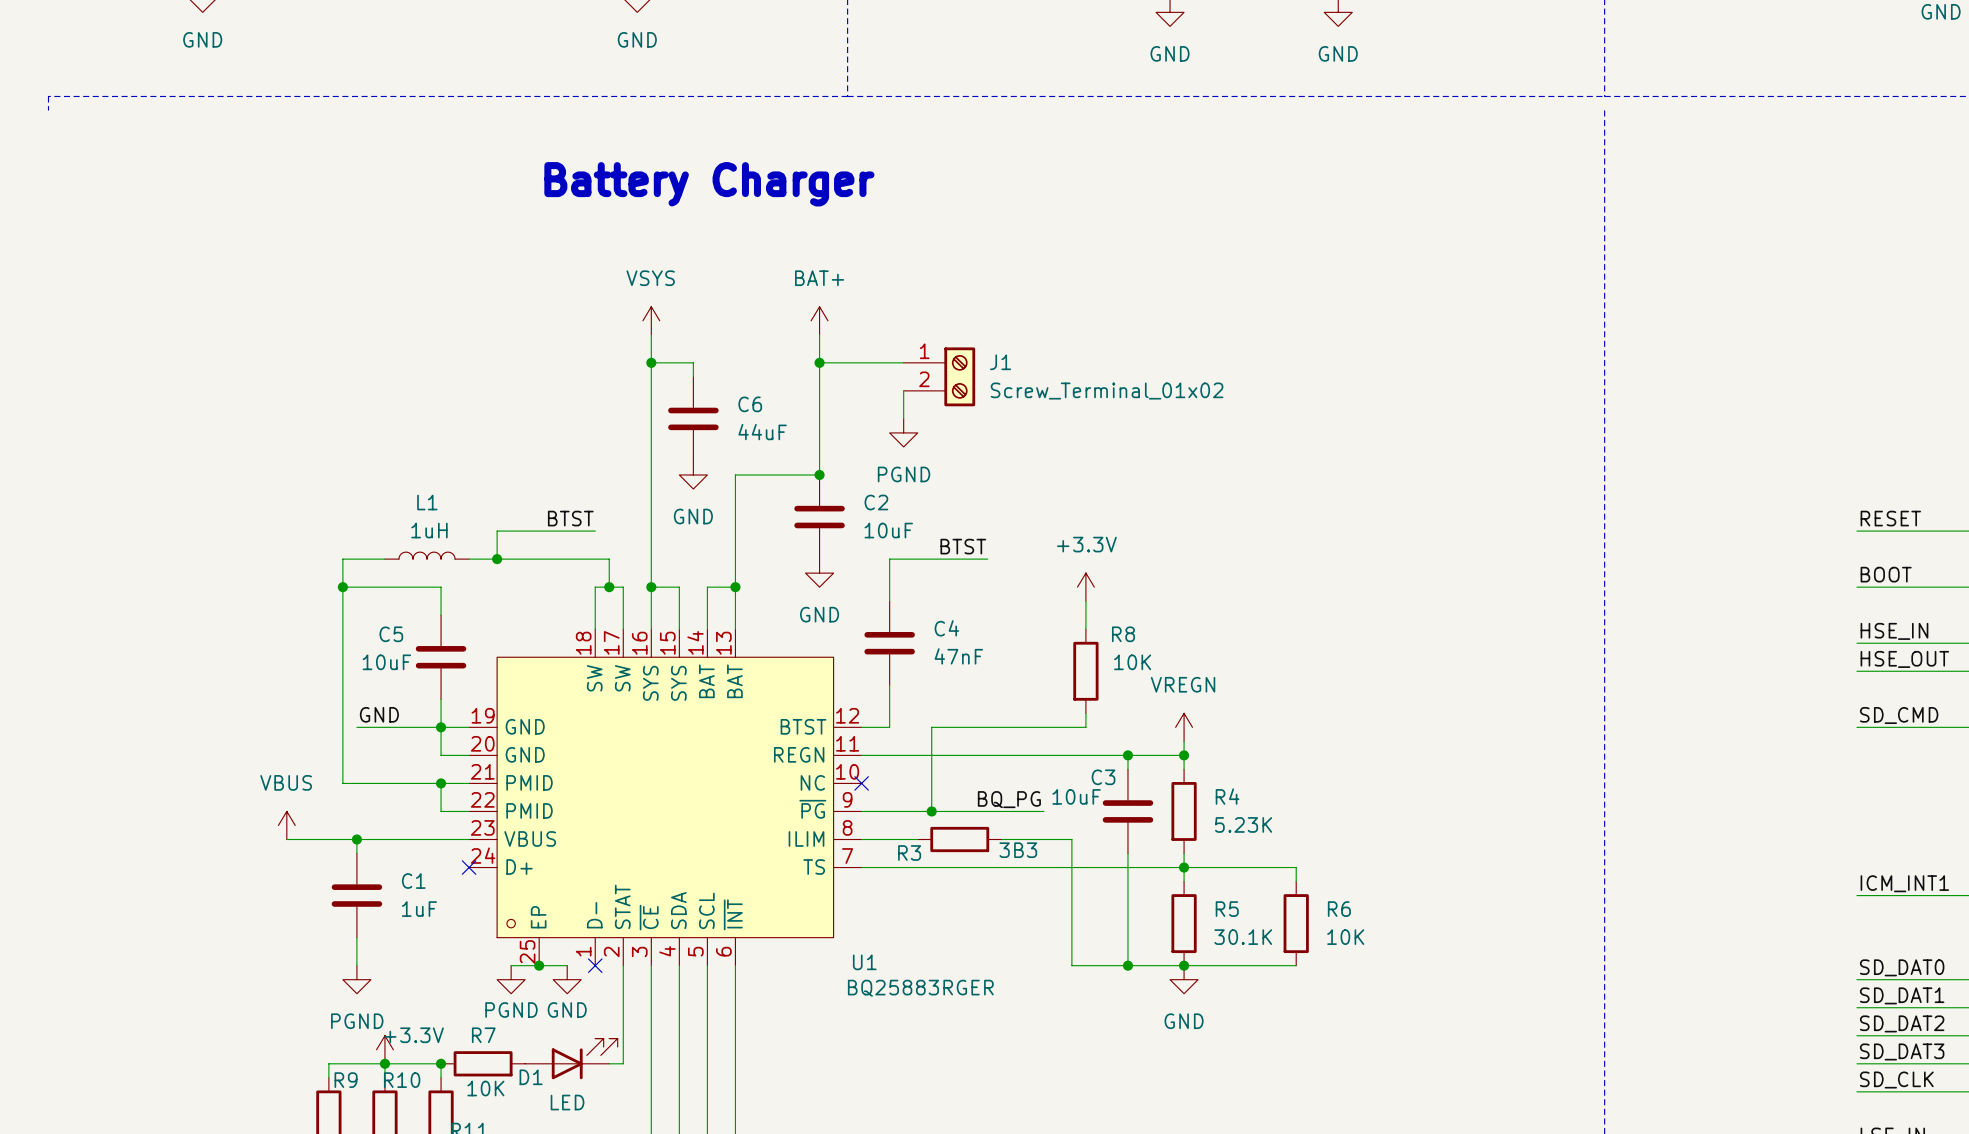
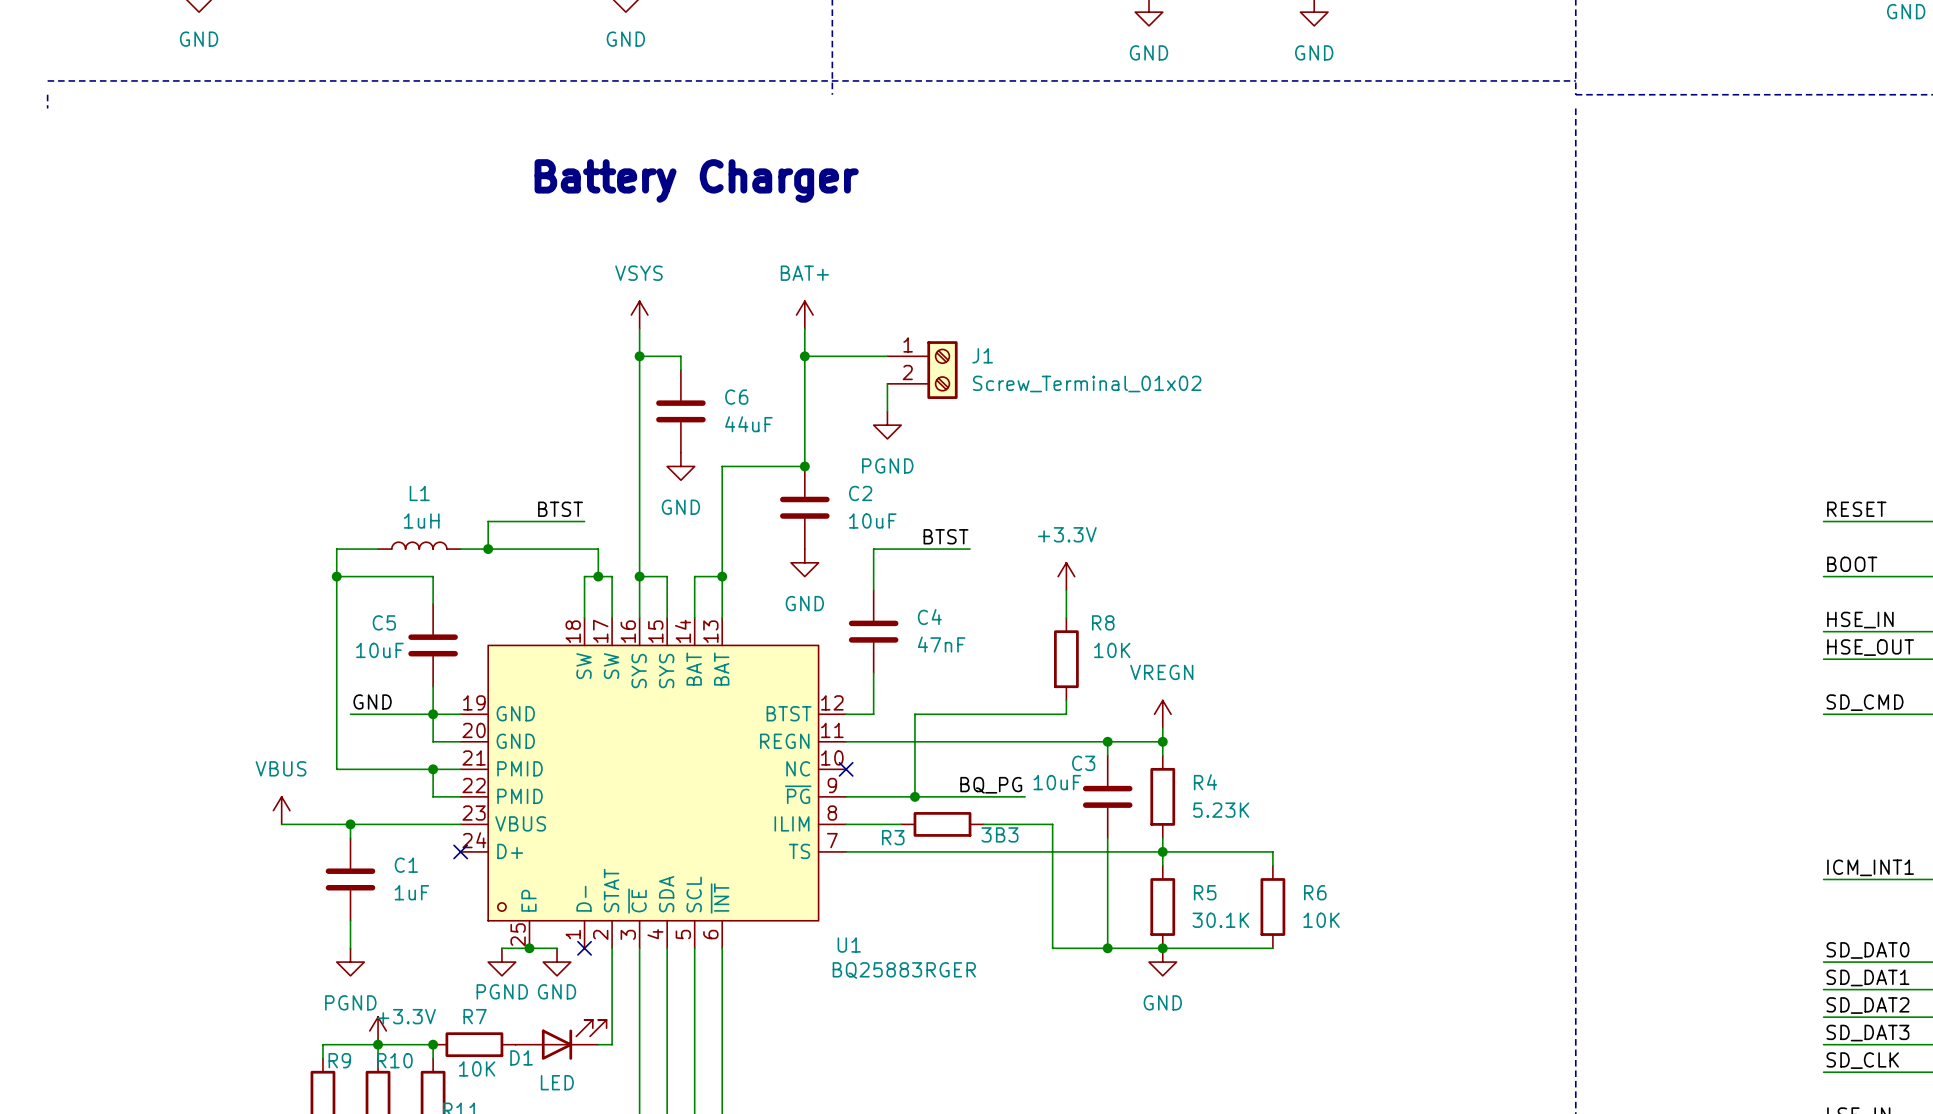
line: (48, 96) (1604, 96) -> (47, 80) (1575, 80)

